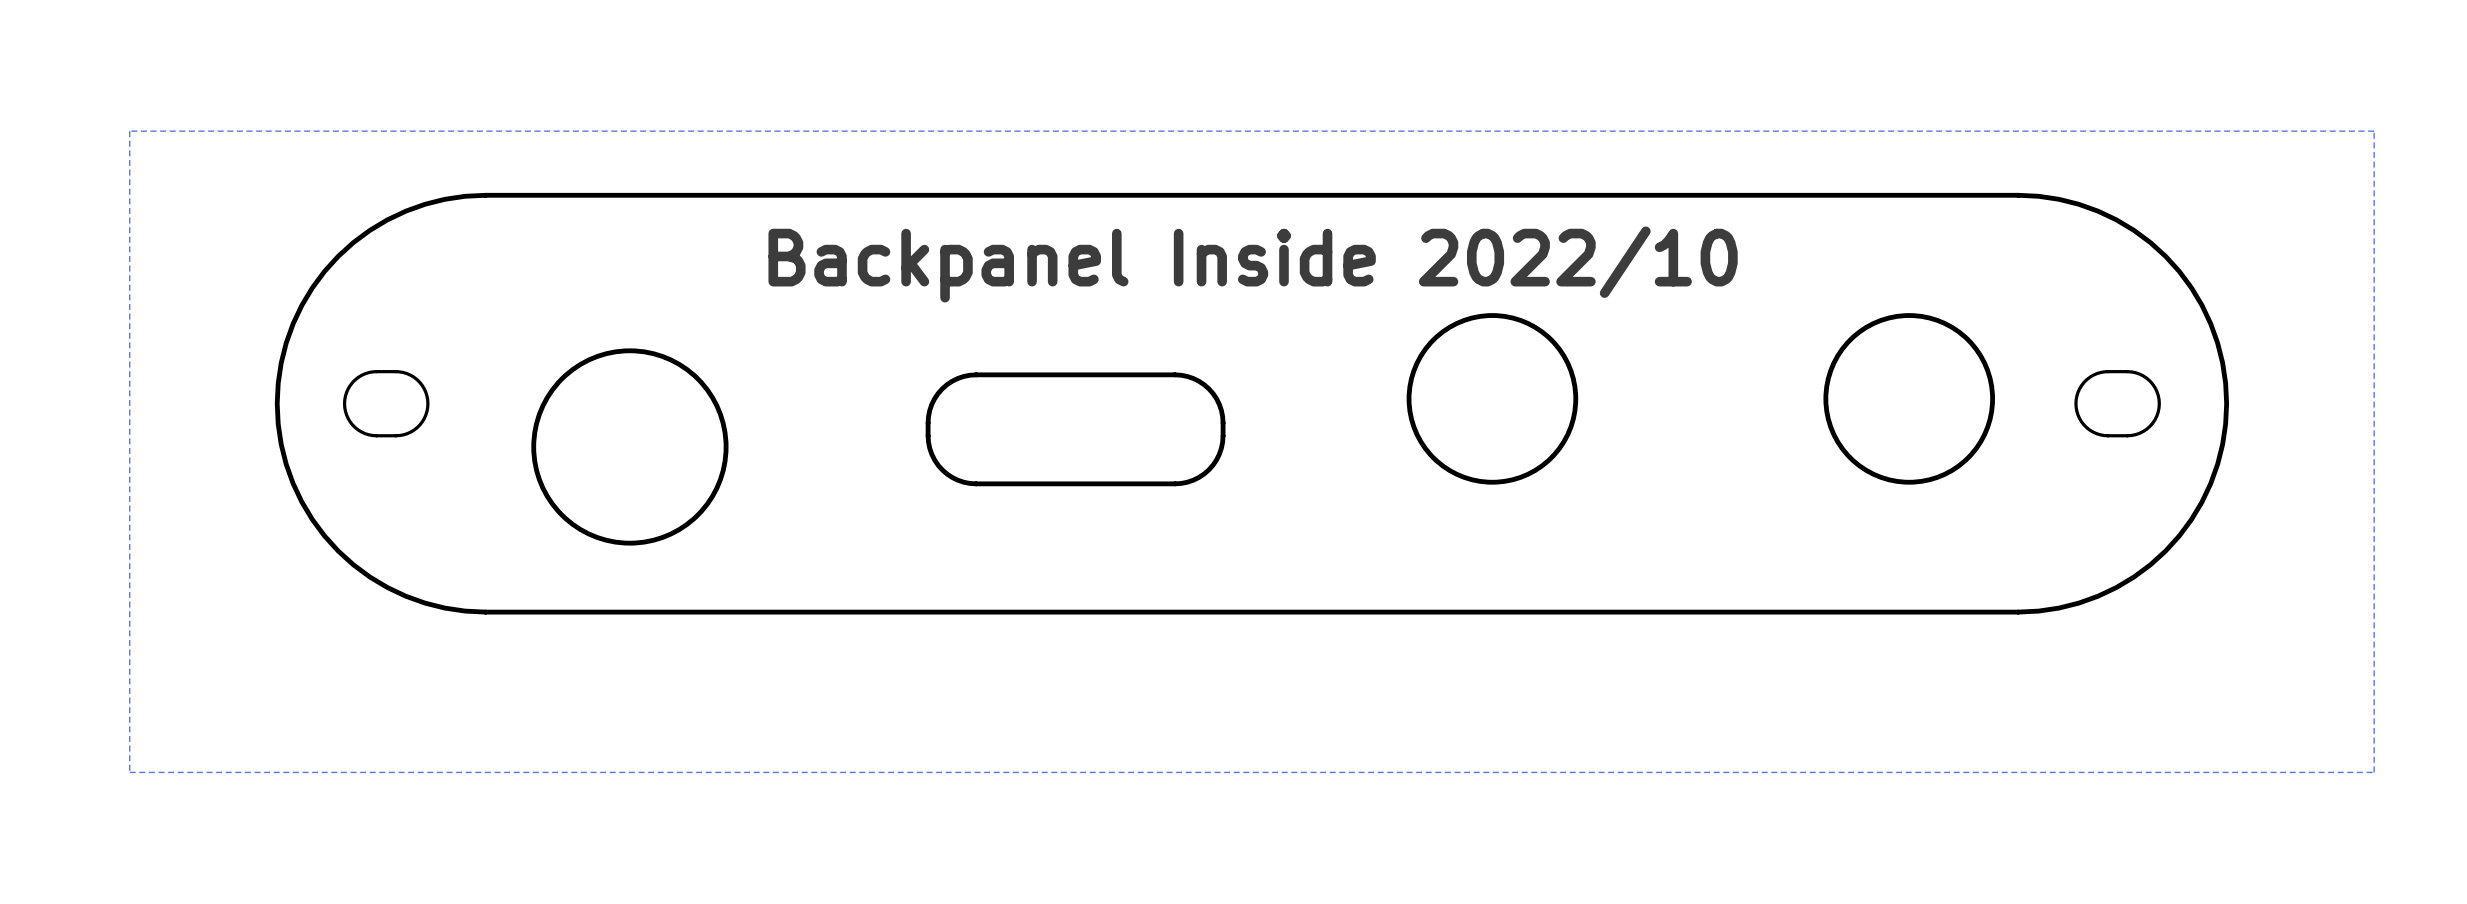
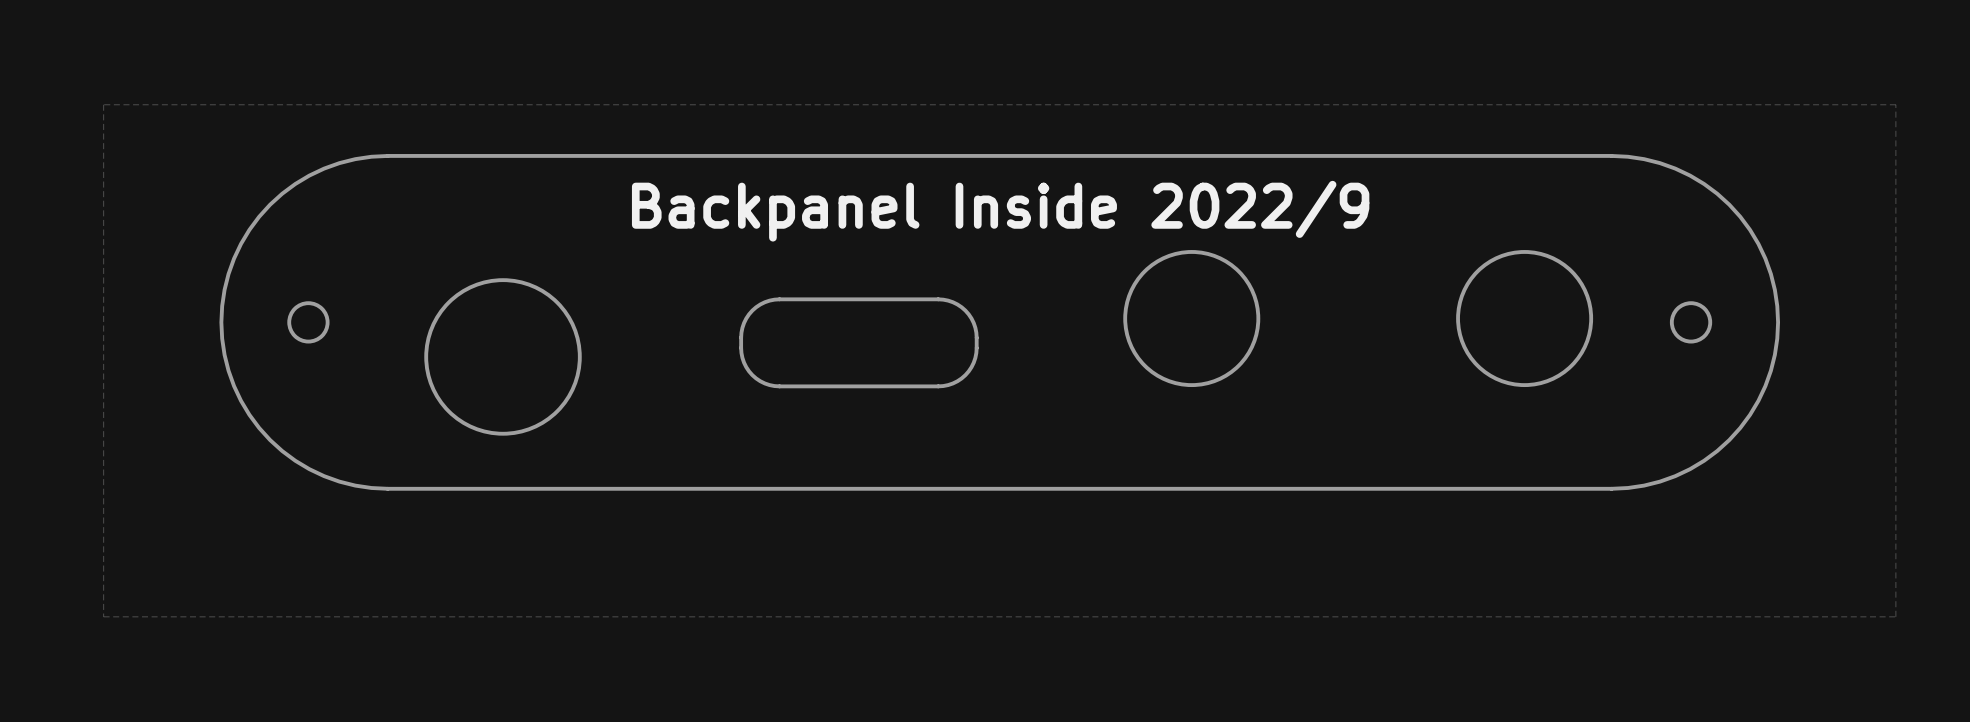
text: Backpanel Inside 2022/10 (1253, 264) -> Backpanel Inside 2022/9 (1000, 211)
board edge: (395, 371) (365, 373) (355, 379) (348, 388) (344, 399) (346, 415) (352, 424) (361, 432) (372, 435) (403, 434) (417, 427) (424, 418) (427, 403) (422, 385) (410, 375) (395, 371) -> none
board edge: (2127, 371) (2096, 373) (2086, 379) (2079, 388) (2076, 399) (2076, 411) (2084, 424) (2093, 432) (2104, 435) (2135, 434) (2146, 429) (2155, 419) (2159, 403) (2155, 387) (2143, 375) (2127, 371) -> none
round board edge: none -> [287, 301, 330, 344]
round board edge: none -> [1669, 301, 1713, 344]

